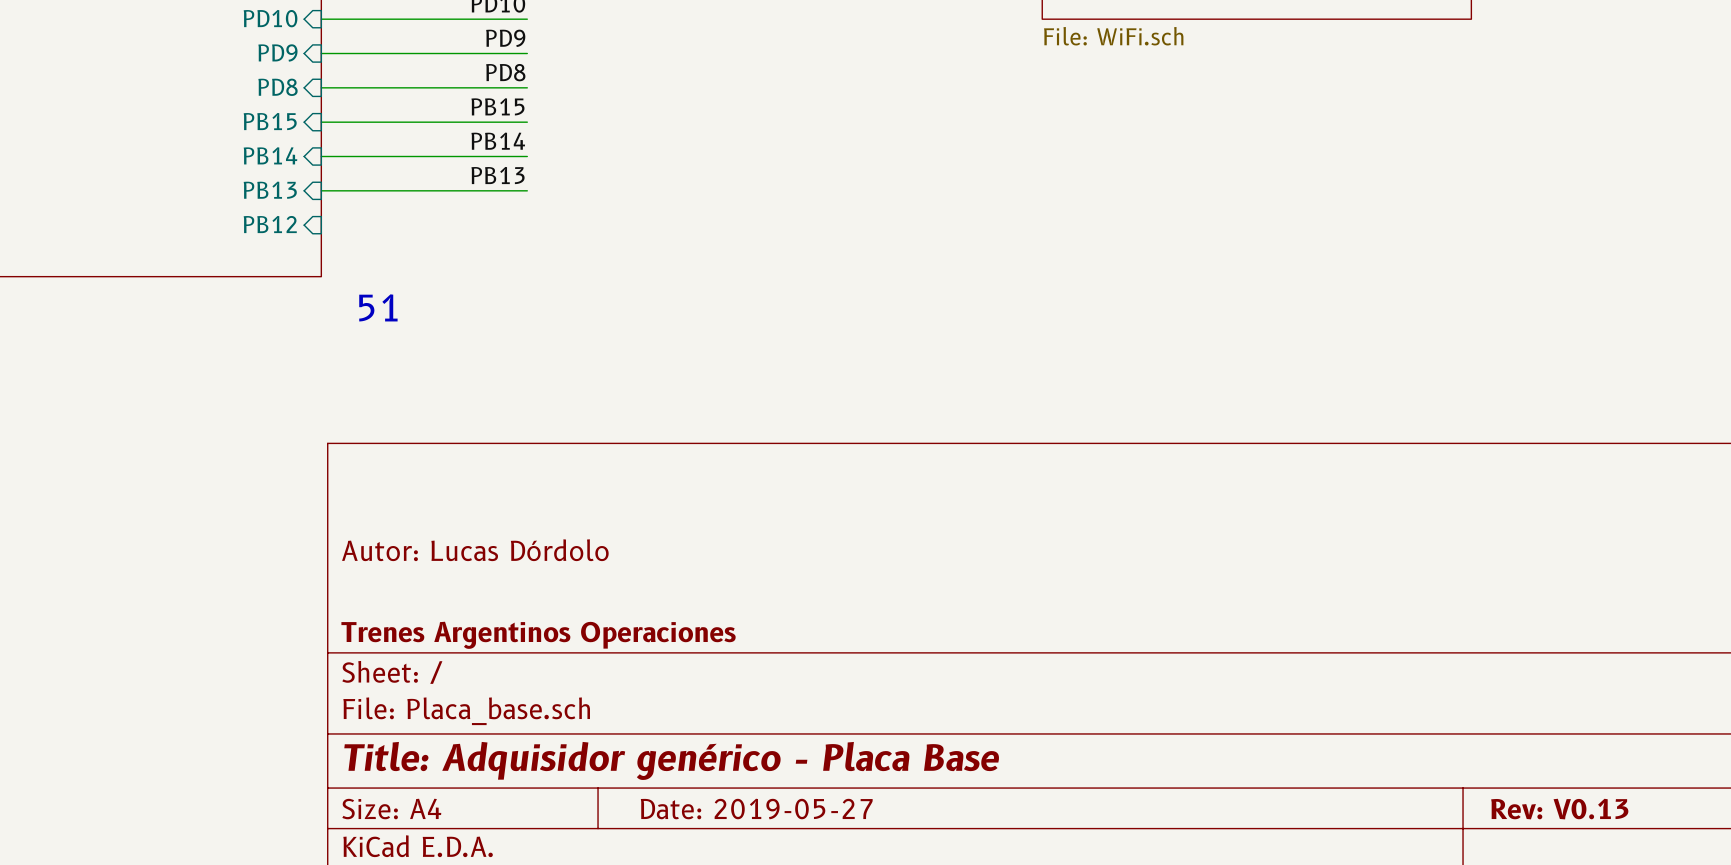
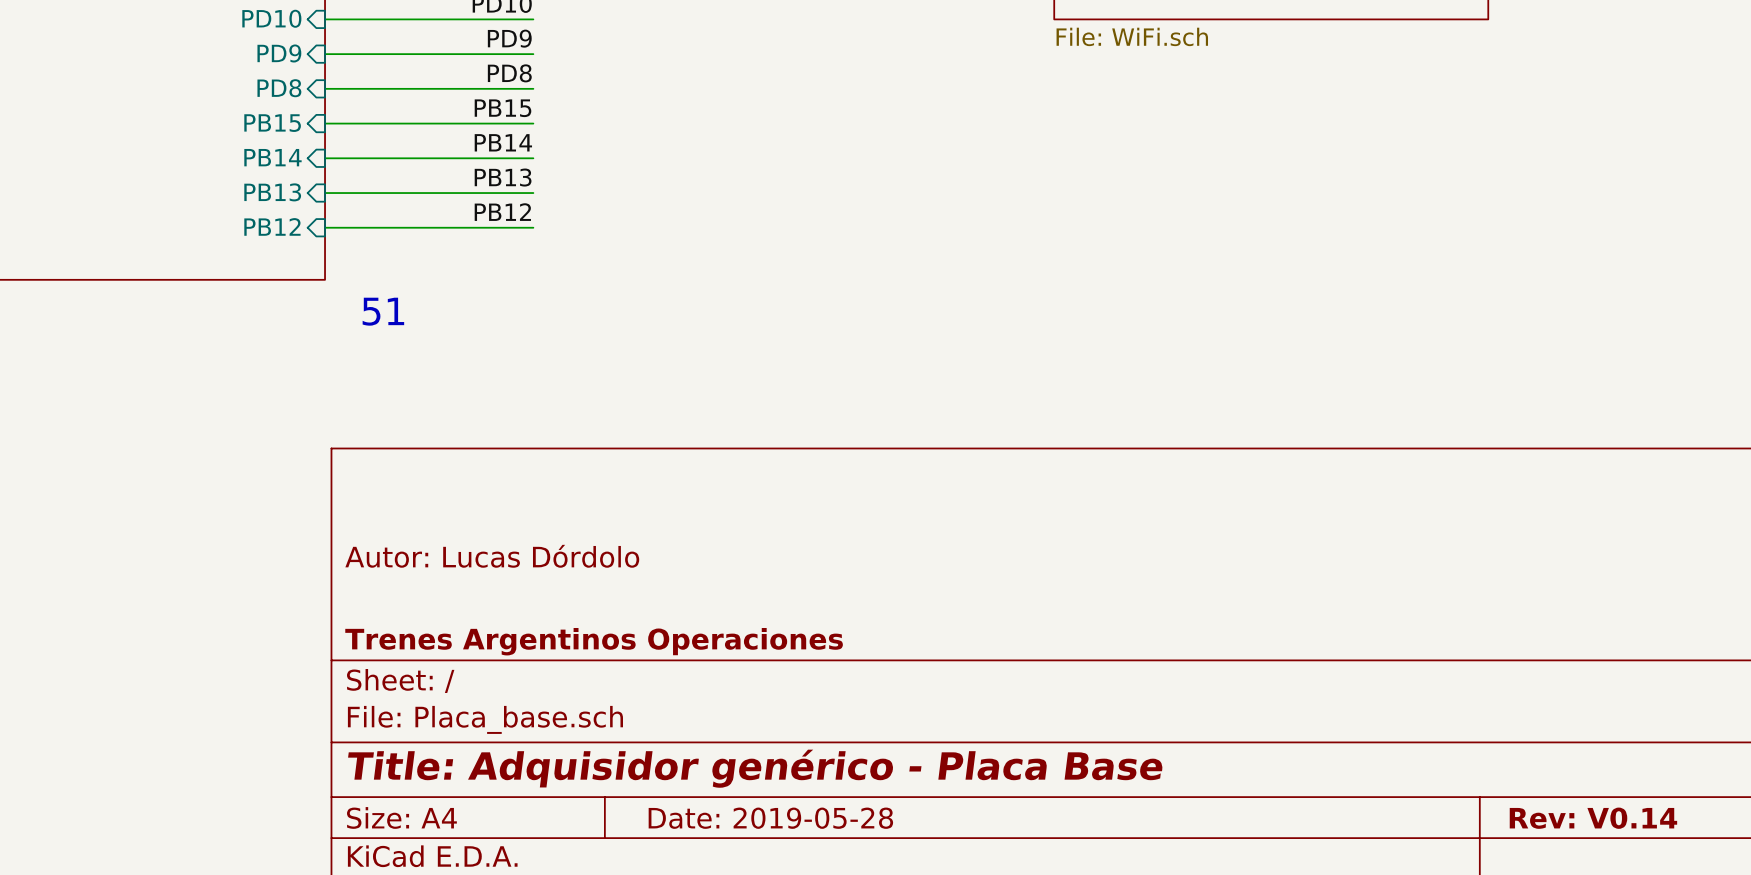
label: none -> PB12 (502, 212)
wire: none -> (325, 227) (533, 227)
title block: Date: 2019-05-27 (756, 809) -> Date: 2019-05-28 (770, 818)
title block: Rev: V0.13 (1559, 809) -> Rev: V0.14 (1593, 818)

